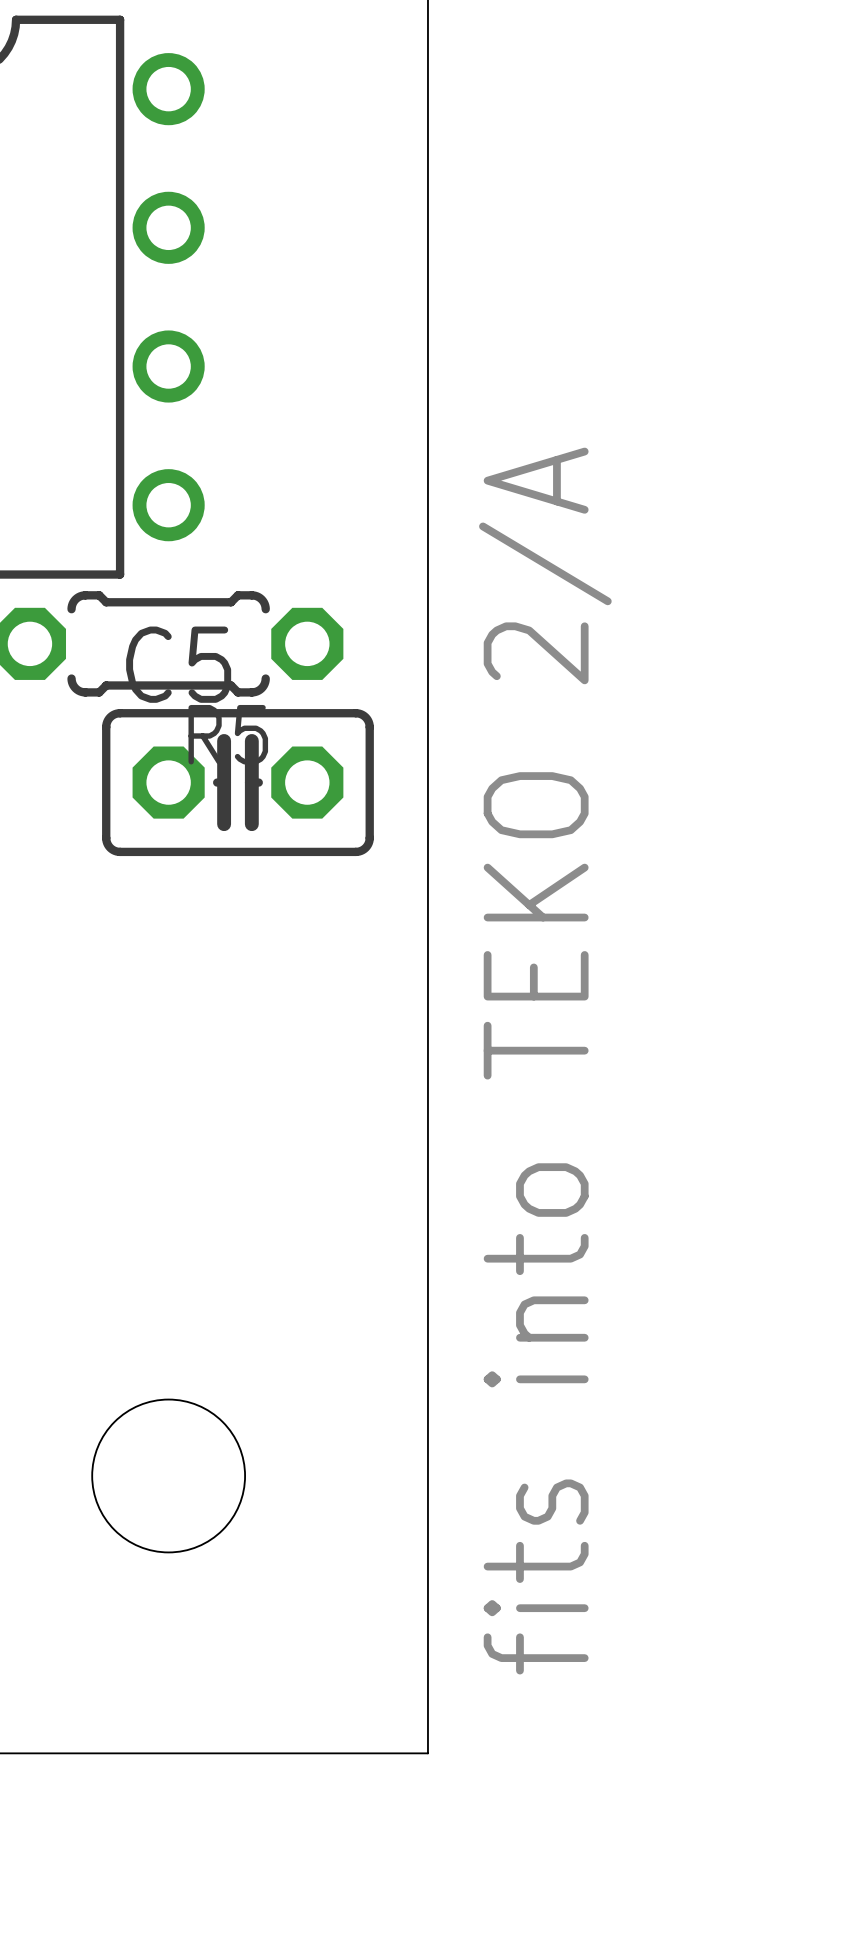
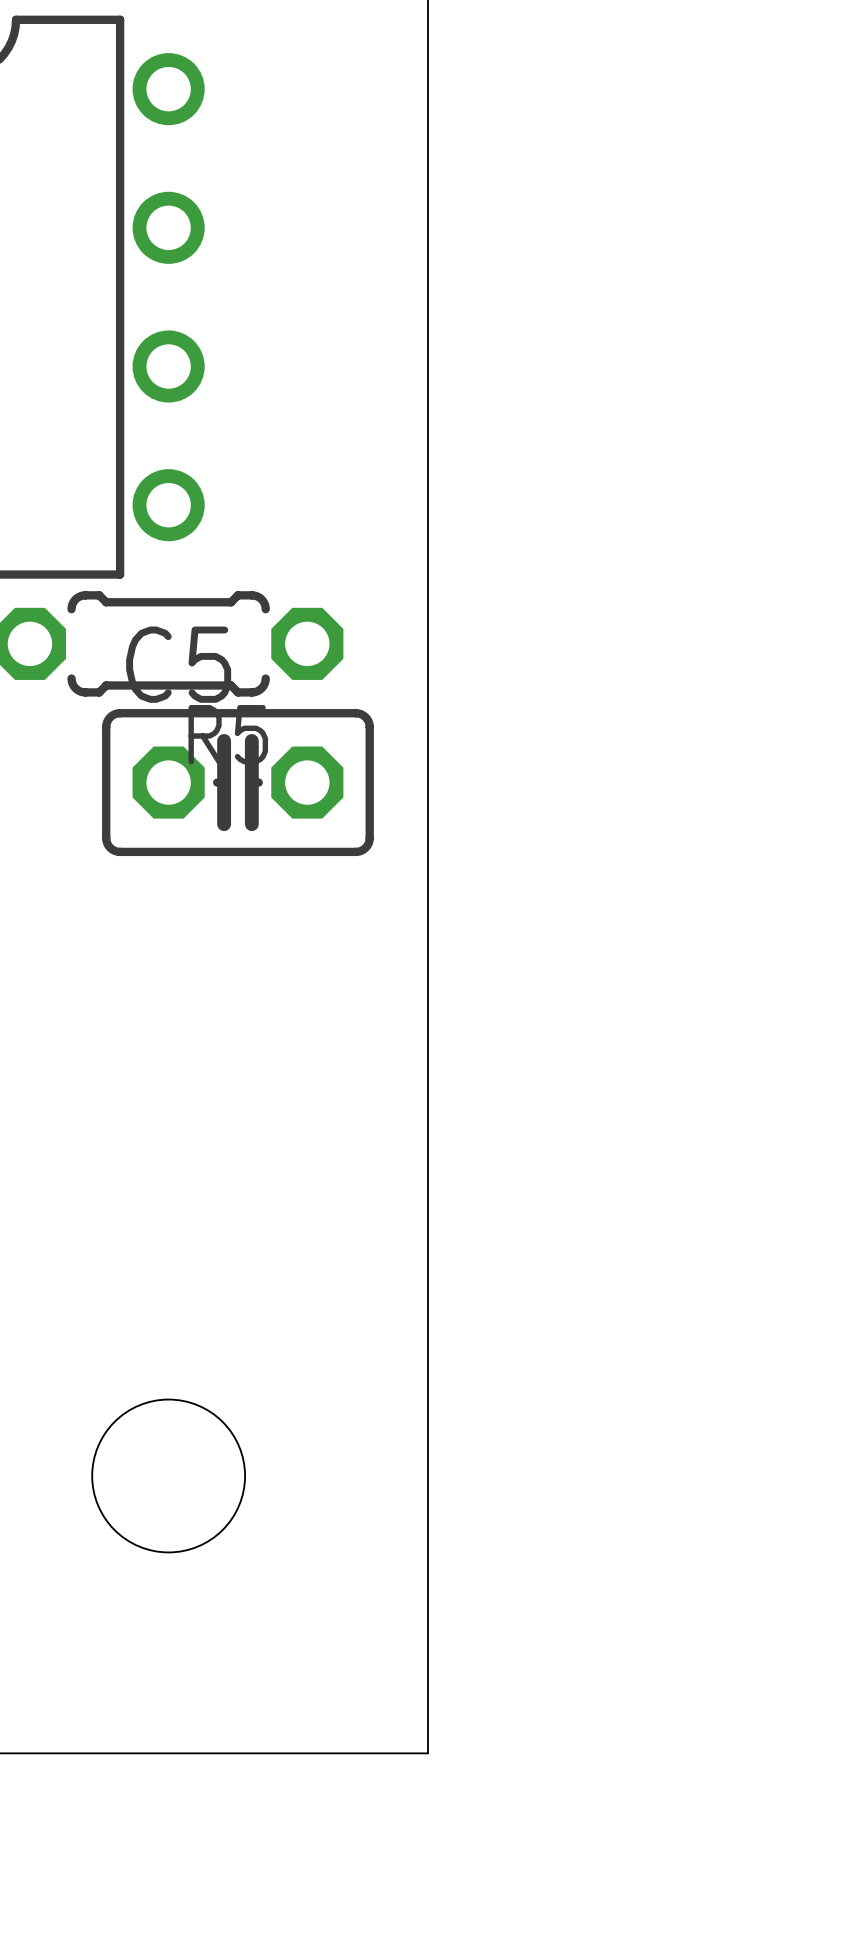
text: fits into TEKO 2/A (545, 1061) -> none

